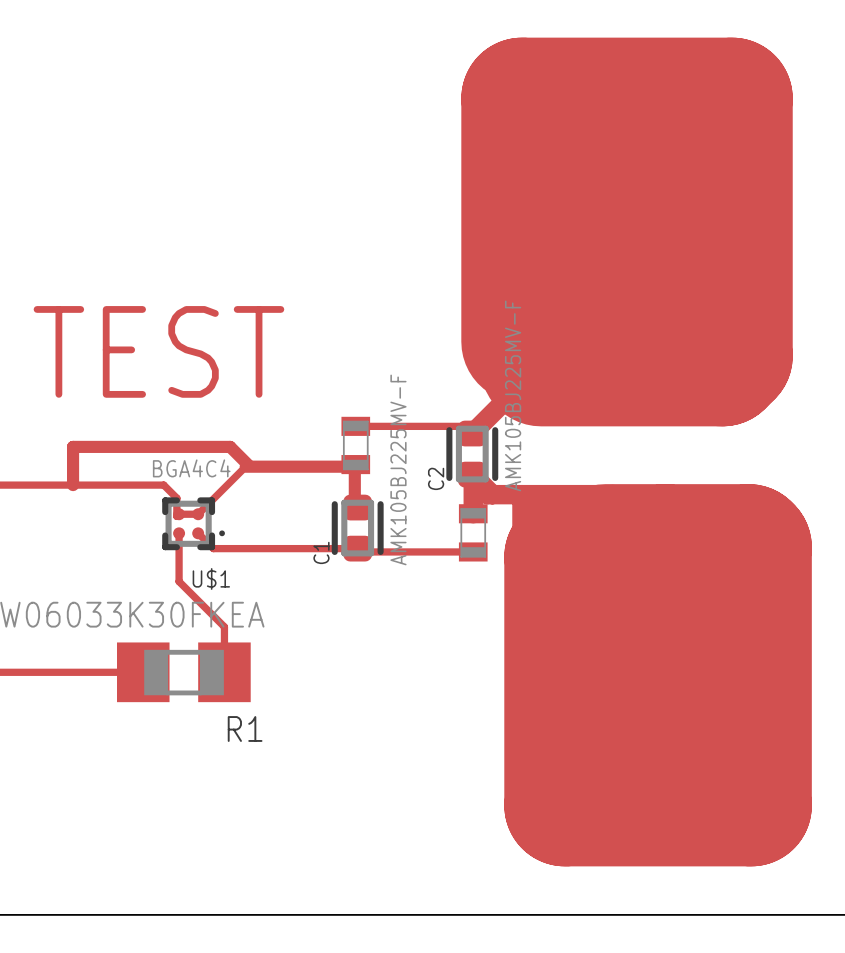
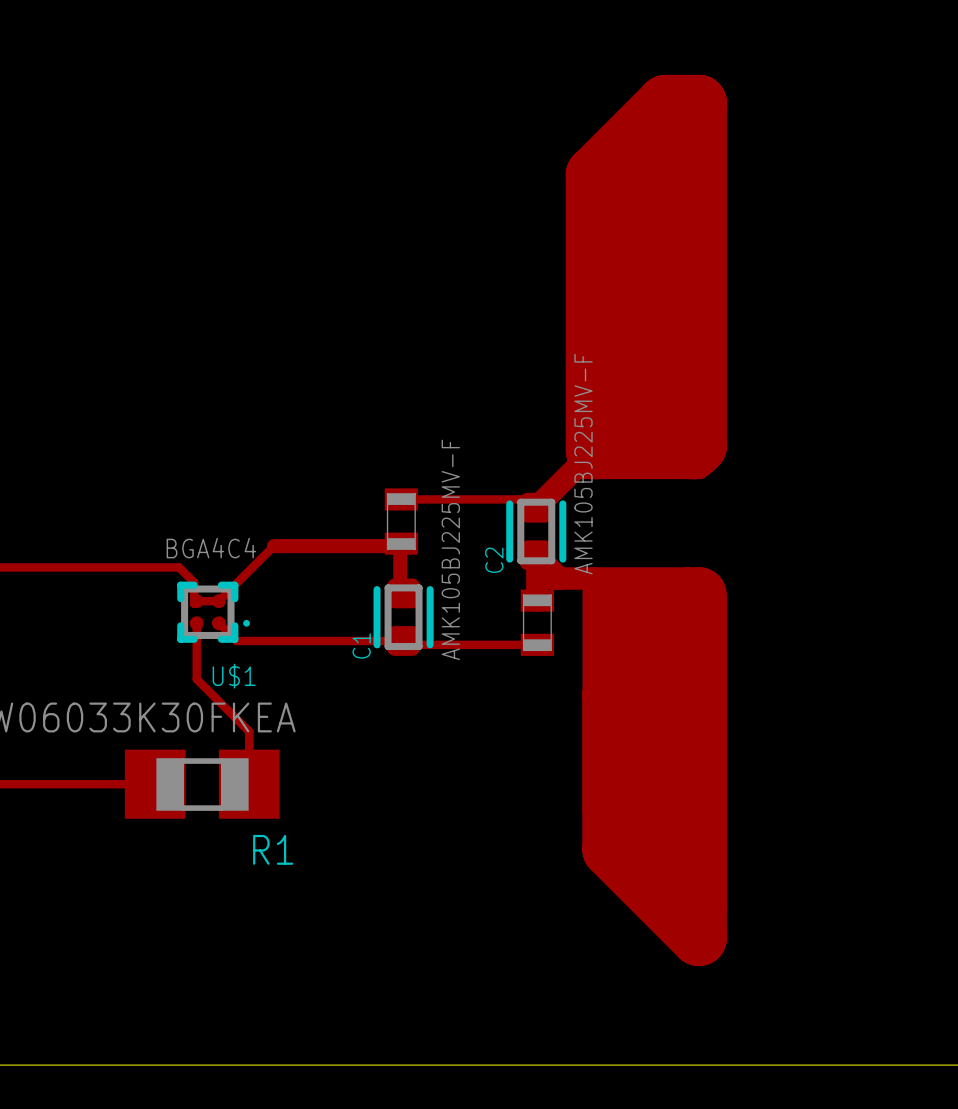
track: (655, 165) (655, 284) (612, 327) -> none
track: (521, 341) (521, 98) (732, 98) (732, 356) (722, 365) (541, 365) -> none
text: TEST (158, 351) -> none
track: (247, 464) (230, 446) (73, 446) (73, 485) -> none
track: (605, 544) (748, 544) (751, 547) (751, 805) (564, 805) (564, 556) (574, 556) -> none
track: (665, 544) (665, 733) -> none

